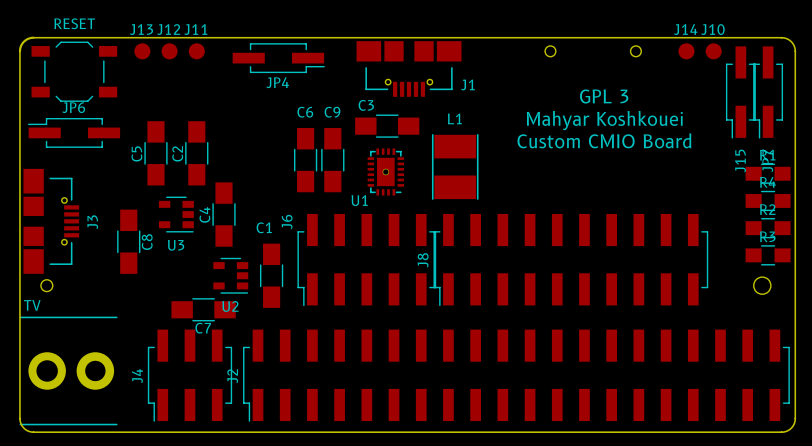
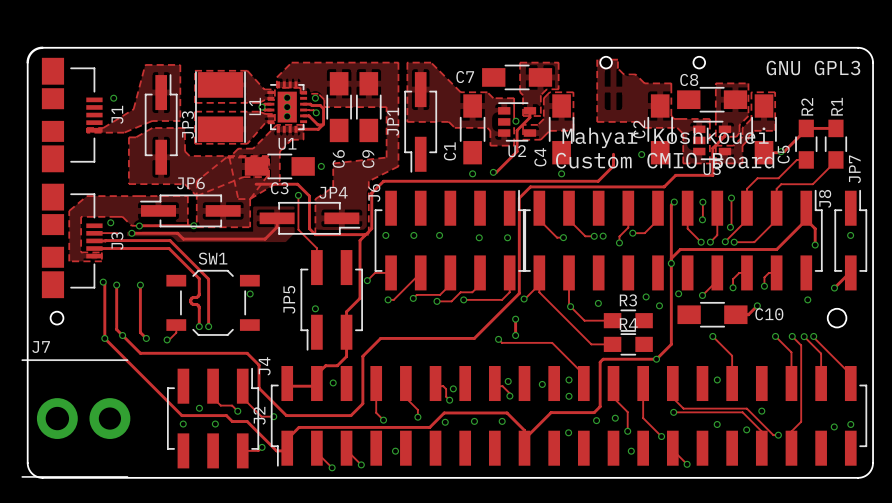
J1 footprint: [356, 41, 462, 97] -> [41, 57, 103, 173]
zone outline: none -> (597, 59) (617, 59) (617, 68) (623, 74) (635, 74) (644, 83) (671, 83) (671, 116) (674, 118) (709, 118) (709, 163) (683, 163) (683, 133) (677, 127) (644, 127) (638, 121) (597, 121) (597, 59)
J13: (142, 51) -> none
J12: (169, 51) -> none
J11: (196, 51) -> none
zone outline: none -> (291, 62) (276, 77) (276, 87) (300, 87) (300, 93) (318, 93) (324, 99) (324, 107) (386, 107) (386, 157) (333, 163) (333, 187) (315, 199) (315, 234) (368, 234) (368, 181) (398, 166) (398, 62) (291, 62)
zone outline: none -> (407, 62) (431, 62) (460, 92) (487, 92) (493, 98) (514, 98) (514, 145) (490, 145) (490, 130) (487, 127) (454, 127) (448, 121) (407, 121) (407, 62)
zone outline: none -> (520, 62) (558, 62) (558, 89) (546, 89) (540, 95) (540, 116) (523, 116) (523, 95) (520, 92) (520, 62)
J14: (686, 51) -> none
J10: (713, 51) -> none
zone outline: none -> (145, 64) (133, 109) (103, 128) (86, 128) (86, 132) (124, 132) (152, 121) (180, 121) (180, 64) (145, 64)
text: none -> GNU GPL3 (813, 68)
zone outline: none -> (194, 70) (194, 102) (259, 102) (264, 99) (274, 99) (274, 89) (264, 89) (247, 70) (194, 70)
JP4 position: (278, 58) -> (309, 218)
zone outline: none -> (715, 83) (748, 83) (748, 116) (739, 124) (739, 132) (736, 136) (715, 136) (715, 83)
RESET: (74, 71) -> none
zone outline: none -> (549, 92) (573, 92) (573, 130) (549, 130) (540, 139) (523, 139) (523, 124) (537, 124) (543, 118) (543, 98) (549, 92)
zone outline: none -> (751, 92) (775, 92) (775, 130) (754, 130) (748, 136) (748, 139) (742, 145) (742, 163) (715, 163) (715, 145) (733, 145) (742, 136) (742, 127) (751, 118) (751, 92)
JP4 name position: JP4 (277, 82) -> JP4 (333, 192)
via: none -> (113, 98)
via: none -> (315, 98)
J1 name position: J1 (467, 84) -> J1 (117, 114)
track: none -> (270, 104) (264, 104) (262, 107) (264, 110) (270, 110)
track: none -> (303, 104) (320, 105) (323, 108) (323, 124) (318, 129) (295, 129)
via: none -> (262, 107)
J15: (740, 92) -> none
JP7 rotation: 0° (768, 92) -> 180° (850, 240)
JP7 position: (768, 92) -> (850, 240)
track: none -> (303, 110) (313, 110) (316, 112)
track: none -> (529, 110) (529, 117) (517, 130) (517, 151) (496, 172) (493, 172)
zone outline: none -> (194, 111) (194, 143) (247, 143) (264, 123) (274, 123) (274, 113) (259, 111) (194, 111)
text: GPL 3 (604, 96) -> none
via: none -> (316, 112)
track: none -> (303, 115) (308, 115) (318, 124) (322, 124)
C3 name position: C3 (366, 105) -> C3 (279, 188)
via: none -> (515, 121)
JP1: none -> (420, 122)
JP3: none -> (161, 124)
zone outline: none -> (152, 128) (184, 128) (184, 151) (189, 156) (269, 156) (269, 177) (243, 177) (196, 196) (184, 184) (128, 184) (128, 137) (135, 137) (152, 128)
track: none -> (835, 128) (806, 128) (784, 151) (764, 152)
C6 name rotation: 0° (305, 112) -> 90° counterclockwise (338, 158)
C6 name position: C6 (305, 112) -> C6 (338, 158)
C9 name rotation: 0° (332, 112) -> 90° counterclockwise (368, 158)
C9 name position: C9 (332, 112) -> C9 (368, 158)
track: none -> (724, 129) (724, 136) (712, 148) (712, 175) (675, 175) (664, 186) (530, 186) (519, 198) (519, 293) (474, 338) (380, 338) (362, 356) (362, 403) (351, 415) (286, 415) (259, 388) (259, 365) (247, 353) (140, 353) (116, 329) (116, 285)
L1 name rotation: 0° (454, 118) -> 90° counterclockwise (255, 106)
L1 name position: L1 (454, 118) -> L1 (255, 106)
C3 position: (387, 126) -> (279, 166)
JP6 position: (74, 132) -> (190, 210)
via: none -> (781, 151)
track: none -> (613, 154) (613, 165) (598, 181) (383, 181) (371, 193) (371, 228) (360, 240) (360, 298) (346, 311) (346, 356) (337, 365) (325, 365) (316, 374) (316, 386) (287, 386)
via: none -> (641, 154)
track: none -> (806, 159) (796, 159) (778, 178) (757, 178) (746, 188) (746, 219) (725, 241)
track: none -> (835, 159) (812, 184) (781, 184) (776, 188) (776, 219) (754, 242) (734, 242)
via: none -> (321, 166)
U1 footprint: [367, 148, 405, 196] -> [267, 81, 308, 133]
via: none -> (493, 172)
C5 name position: C5 (136, 153) -> C5 (783, 154)
C5 position: (155, 153) -> (764, 129)
C2 position: (196, 153) -> (660, 129)
via: none -> (472, 173)
via: none -> (561, 173)
C6 position: (305, 160) -> (339, 107)
C9 position: (332, 160) -> (368, 107)
track: none -> (256, 184) (297, 184) (309, 196) (309, 228) (315, 234) (365, 234)
L1 position: (455, 166) -> (220, 107)
J3 footprint: [23, 168, 80, 274] -> [41, 183, 103, 299]
zone outline: none -> (87, 196) (69, 210) (69, 261) (101, 261) (101, 252) (81, 252) (81, 216) (122, 216) (131, 225) (187, 225) (187, 196) (87, 196)
track: none -> (298, 195) (298, 229) (316, 248) (316, 267)
via: none -> (298, 195)
R1 rotation: 0° (768, 173) -> 90° clockwise (835, 144)
R1 position: (768, 173) -> (835, 144)
track: none -> (731, 198) (730, 227)
via: none -> (731, 198)
zone outline: none -> (250, 199) (267, 175) (267, 157) (226, 157) (196, 181) (196, 227) (250, 227) (250, 199)
zone outline: none -> (250, 199) (238, 199) (229, 157) (238, 148) (253, 148) (276, 124) (303, 124) (303, 139) (291, 139) (279, 151) (279, 181) (250, 199)
track: none -> (674, 202) (671, 204) (671, 344) (656, 359) (603, 359) (600, 362) (600, 406) (594, 412) (551, 412) (524, 439)
via: none -> (674, 202)
track: none -> (702, 202) (702, 219)
via: none -> (702, 202)
track: none -> (539, 208) (539, 219) (557, 237) (563, 237)
track: none -> (569, 208) (569, 219) (585, 236) (594, 236)
track: none -> (628, 208) (628, 227) (619, 236) (619, 242)
track: none -> (657, 208) (657, 219) (644, 233) (632, 233)
track: none -> (687, 208) (687, 228) (701, 242)
track: none -> (717, 208) (717, 235) (710, 242)
track: none -> (806, 208) (806, 219) (776, 249) (680, 249) (671, 258)
track: none -> (277, 218) (277, 227) (265, 239) (183, 239) (177, 233) (131, 233)
via: none -> (702, 219)
track: none -> (806, 219) (815, 228) (815, 245)
via: none -> (110, 222)
track: none -> (193, 225) (139, 225)
via: none -> (193, 225)
U1 name position: U1 (359, 200) -> U1 (287, 143)
R4 position: (768, 200) -> (628, 344)
via: none -> (139, 225)
via: none -> (730, 227)
track: none -> (117, 233) (94, 233)
via: none -> (131, 233)
via: none -> (632, 233)
via: none -> (385, 235)
via: none -> (413, 235)
via: none -> (439, 235)
via: none -> (850, 235)
via: none -> (594, 236)
via: none -> (603, 236)
via: none -> (479, 237)
via: none -> (507, 237)
via: none -> (563, 237)
track: none -> (94, 240) (170, 240) (208, 279) (208, 326)
U3 rotation: 0° (176, 214) -> 180° (712, 140)
U3 position: (176, 214) -> (712, 140)
C4 name position: C4 (204, 214) -> C4 (540, 157)
C4 position: (223, 214) -> (561, 129)
via: none -> (710, 242)
via: none -> (725, 241)
via: none -> (619, 242)
via: none -> (701, 242)
via: none -> (734, 242)
via: none -> (815, 245)
track: none -> (94, 248) (169, 248) (199, 278) (198, 295) (191, 298) (190, 300) (199, 307) (199, 326)
C1 name rotation: 0° (264, 227) -> 90° counterclockwise (449, 151)
C1 name position: C1 (264, 227) -> C1 (449, 151)
R2 rotation: 0° (768, 228) -> 90° clockwise (806, 144)
R2 position: (768, 228) -> (806, 144)
via: none -> (671, 263)
C8 rotation: 0° (128, 241) -> 90° clockwise (712, 99)
C8 position: (128, 241) -> (712, 99)
C8 name position: C8 (147, 242) -> C8 (689, 79)
track: none -> (391, 272) (375, 272) (367, 280)
track: none -> (420, 272) (393, 299) (388, 299)
track: none -> (450, 272) (450, 284) (440, 294) (416, 294) (413, 298)
track: none -> (479, 272) (480, 284) (472, 292) (460, 292) (451, 301) (437, 301)
track: none -> (509, 272) (509, 292) (502, 299) (463, 299)
track: none -> (539, 272) (539, 292) (591, 344) (612, 344)
track: none -> (569, 272) (569, 305) (584, 320) (612, 320)
track: none -> (746, 272) (739, 272) (733, 279) (733, 287)
track: none -> (776, 272) (768, 272) (764, 277) (764, 286)
track: none -> (850, 272) (834, 288)
via: none -> (367, 280)
track: none -> (717, 280) (702, 295)
track: none -> (103, 282) (104, 283) (104, 338) (181, 415) (226, 415) (232, 421) (247, 421) (276, 450) (287, 450) (287, 439) (299, 427) (429, 427) (444, 412) (507, 412) (524, 430) (524, 450)
via: none -> (103, 282)
track: none -> (539, 284) (524, 299)
via: none -> (116, 285)
track: none -> (140, 285) (140, 332) (146, 338)
via: none -> (140, 285)
R3 position: (768, 255) -> (628, 320)
via: none -> (764, 286)
via: none -> (733, 287)
via: none -> (834, 288)
J6 rotation: 0° (366, 260) -> 180° (450, 240)
J8 name position: J8 (423, 260) -> J8 (825, 198)
J8 rotation: 0° (570, 260) -> 180° (672, 240)
via: none -> (250, 293)
via: none -> (678, 293)
via: none -> (702, 295)
via: none -> (646, 296)
via: none -> (413, 298)
via: none -> (388, 299)
via: none -> (463, 299)
via: none -> (524, 299)
via: none -> (807, 299)
JP5: none -> (331, 300)
via: none -> (437, 301)
SW1: none -> (213, 302)
via: none -> (598, 303)
via: none -> (659, 305)
track: none -> (757, 305) (748, 314) (735, 314)
via: none -> (757, 305)
U2 rotation: 0° (230, 275) -> 180° (517, 121)
U2 position: (230, 275) -> (517, 121)
C1 position: (271, 275) -> (472, 129)
via: none -> (570, 306)
via: none -> (315, 308)
C10: none -> (712, 314)
track: none -> (515, 319) (515, 335)
via: none -> (515, 319)
track: none -> (176, 325) (176, 332) (167, 339)
via: none -> (199, 326)
via: none -> (208, 326)
via: none -> (122, 335)
via: none -> (515, 335)
track: none -> (712, 336) (732, 355) (732, 386)
via: none -> (712, 336)
track: none -> (775, 336) (791, 352) (791, 386)
via: none -> (775, 336)
track: none -> (792, 336) (801, 345) (801, 421) (791, 431) (791, 450)
via: none -> (792, 336)
track: none -> (804, 336) (821, 353) (821, 386)
via: none -> (804, 336)
track: none -> (813, 336) (850, 374) (850, 386)
via: none -> (813, 336)
via: none -> (104, 338)
via: none -> (146, 338)
via: none -> (167, 339)
track: none -> (498, 339) (502, 342) (552, 342) (583, 374) (583, 386)
via: none -> (498, 339)
C7 position: (203, 309) -> (517, 77)
via: none -> (656, 359)
C7 name position: C7 (203, 328) -> C7 (465, 77)
via: none -> (569, 379)
via: none -> (717, 379)
via: none -> (508, 381)
via: none -> (333, 382)
via: none -> (542, 384)
track: none -> (213, 386) (213, 397) (220, 405) (232, 405) (237, 411)
track: none -> (242, 386) (242, 397) (261, 416) (273, 416)
track: none -> (376, 386) (376, 412) (383, 420)
track: none -> (405, 386) (405, 397) (417, 409) (417, 417)
track: none -> (435, 386) (443, 386) (446, 389) (446, 396) (449, 400)
track: none -> (494, 386) (502, 386) (509, 393) (509, 396)
track: none -> (613, 386) (613, 397) (627, 412) (627, 431)
track: none -> (643, 386) (643, 418) (661, 436)
track: none -> (672, 386) (672, 397) (683, 408) (746, 408) (773, 435) (778, 435)
via: none -> (453, 388)
via: none -> (509, 396)
via: none -> (569, 396)
via: none -> (449, 400)
via: none -> (199, 408)
TV: (68, 370) -> none
via: none -> (761, 411)
via: none -> (237, 411)
track: none -> (673, 412) (742, 412) (761, 431) (761, 450)
via: none -> (673, 412)
J4 rotation: 0° (189, 375) -> 180° (213, 418)
J4 name position: J4 (137, 376) -> J4 (264, 366)
via: none -> (273, 416)
via: none -> (417, 417)
J7: none -> (75, 418)
via: none -> (615, 418)
via: none -> (383, 420)
via: none -> (596, 420)
via: none -> (474, 421)
via: none -> (502, 421)
via: none -> (445, 422)
via: none -> (183, 424)
via: none -> (215, 424)
via: none -> (717, 424)
via: none -> (850, 424)
via: none -> (834, 426)
via: none -> (746, 429)
via: none -> (627, 431)
via: none -> (568, 432)
via: none -> (778, 435)
via: none -> (661, 436)
track: none -> (262, 447) (258, 450) (242, 450)
via: none -> (262, 447)
track: none -> (316, 450) (332, 467)
track: none -> (346, 450) (361, 464)
via: none -> (395, 451)
via: none -> (631, 451)
track: none -> (672, 450) (687, 464)
via: none -> (687, 464)
via: none -> (361, 464)
via: none -> (332, 467)

